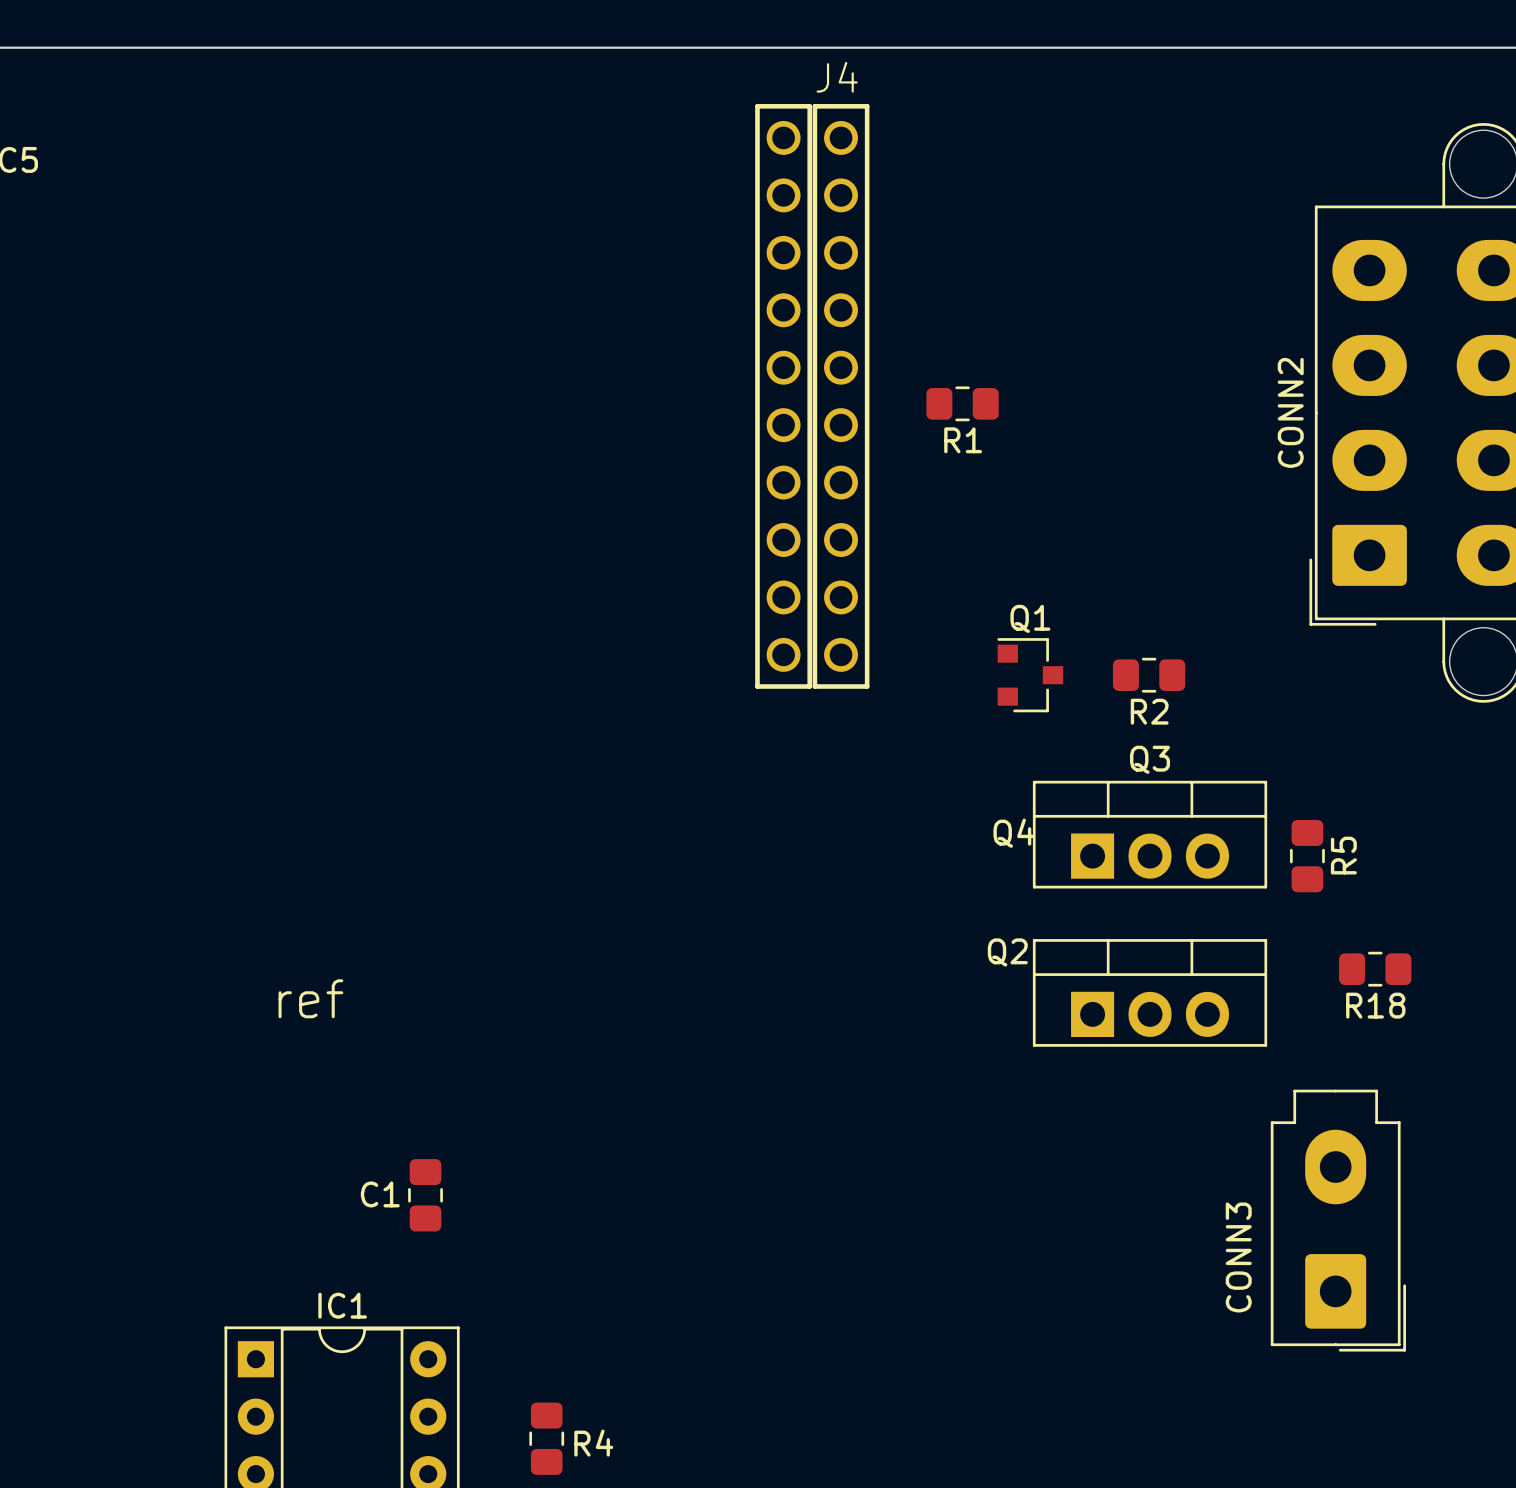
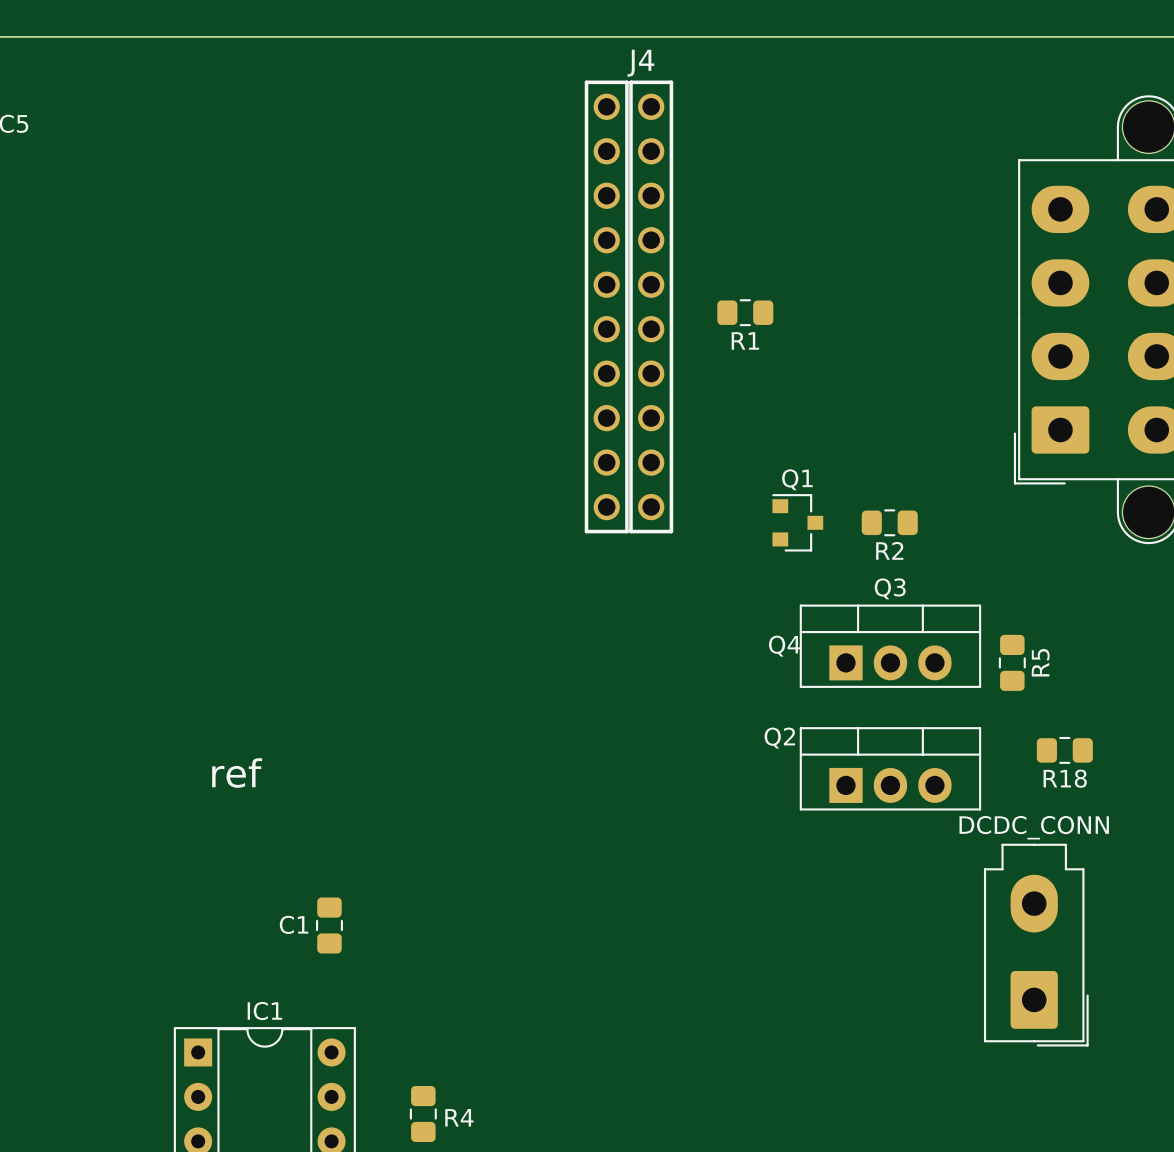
CONN2 name: CONN2 (1290, 412) -> none
CONN3 value: none -> DCDC_CONN (1034, 827)
CONN3 name: CONN3 (1238, 1257) -> none

